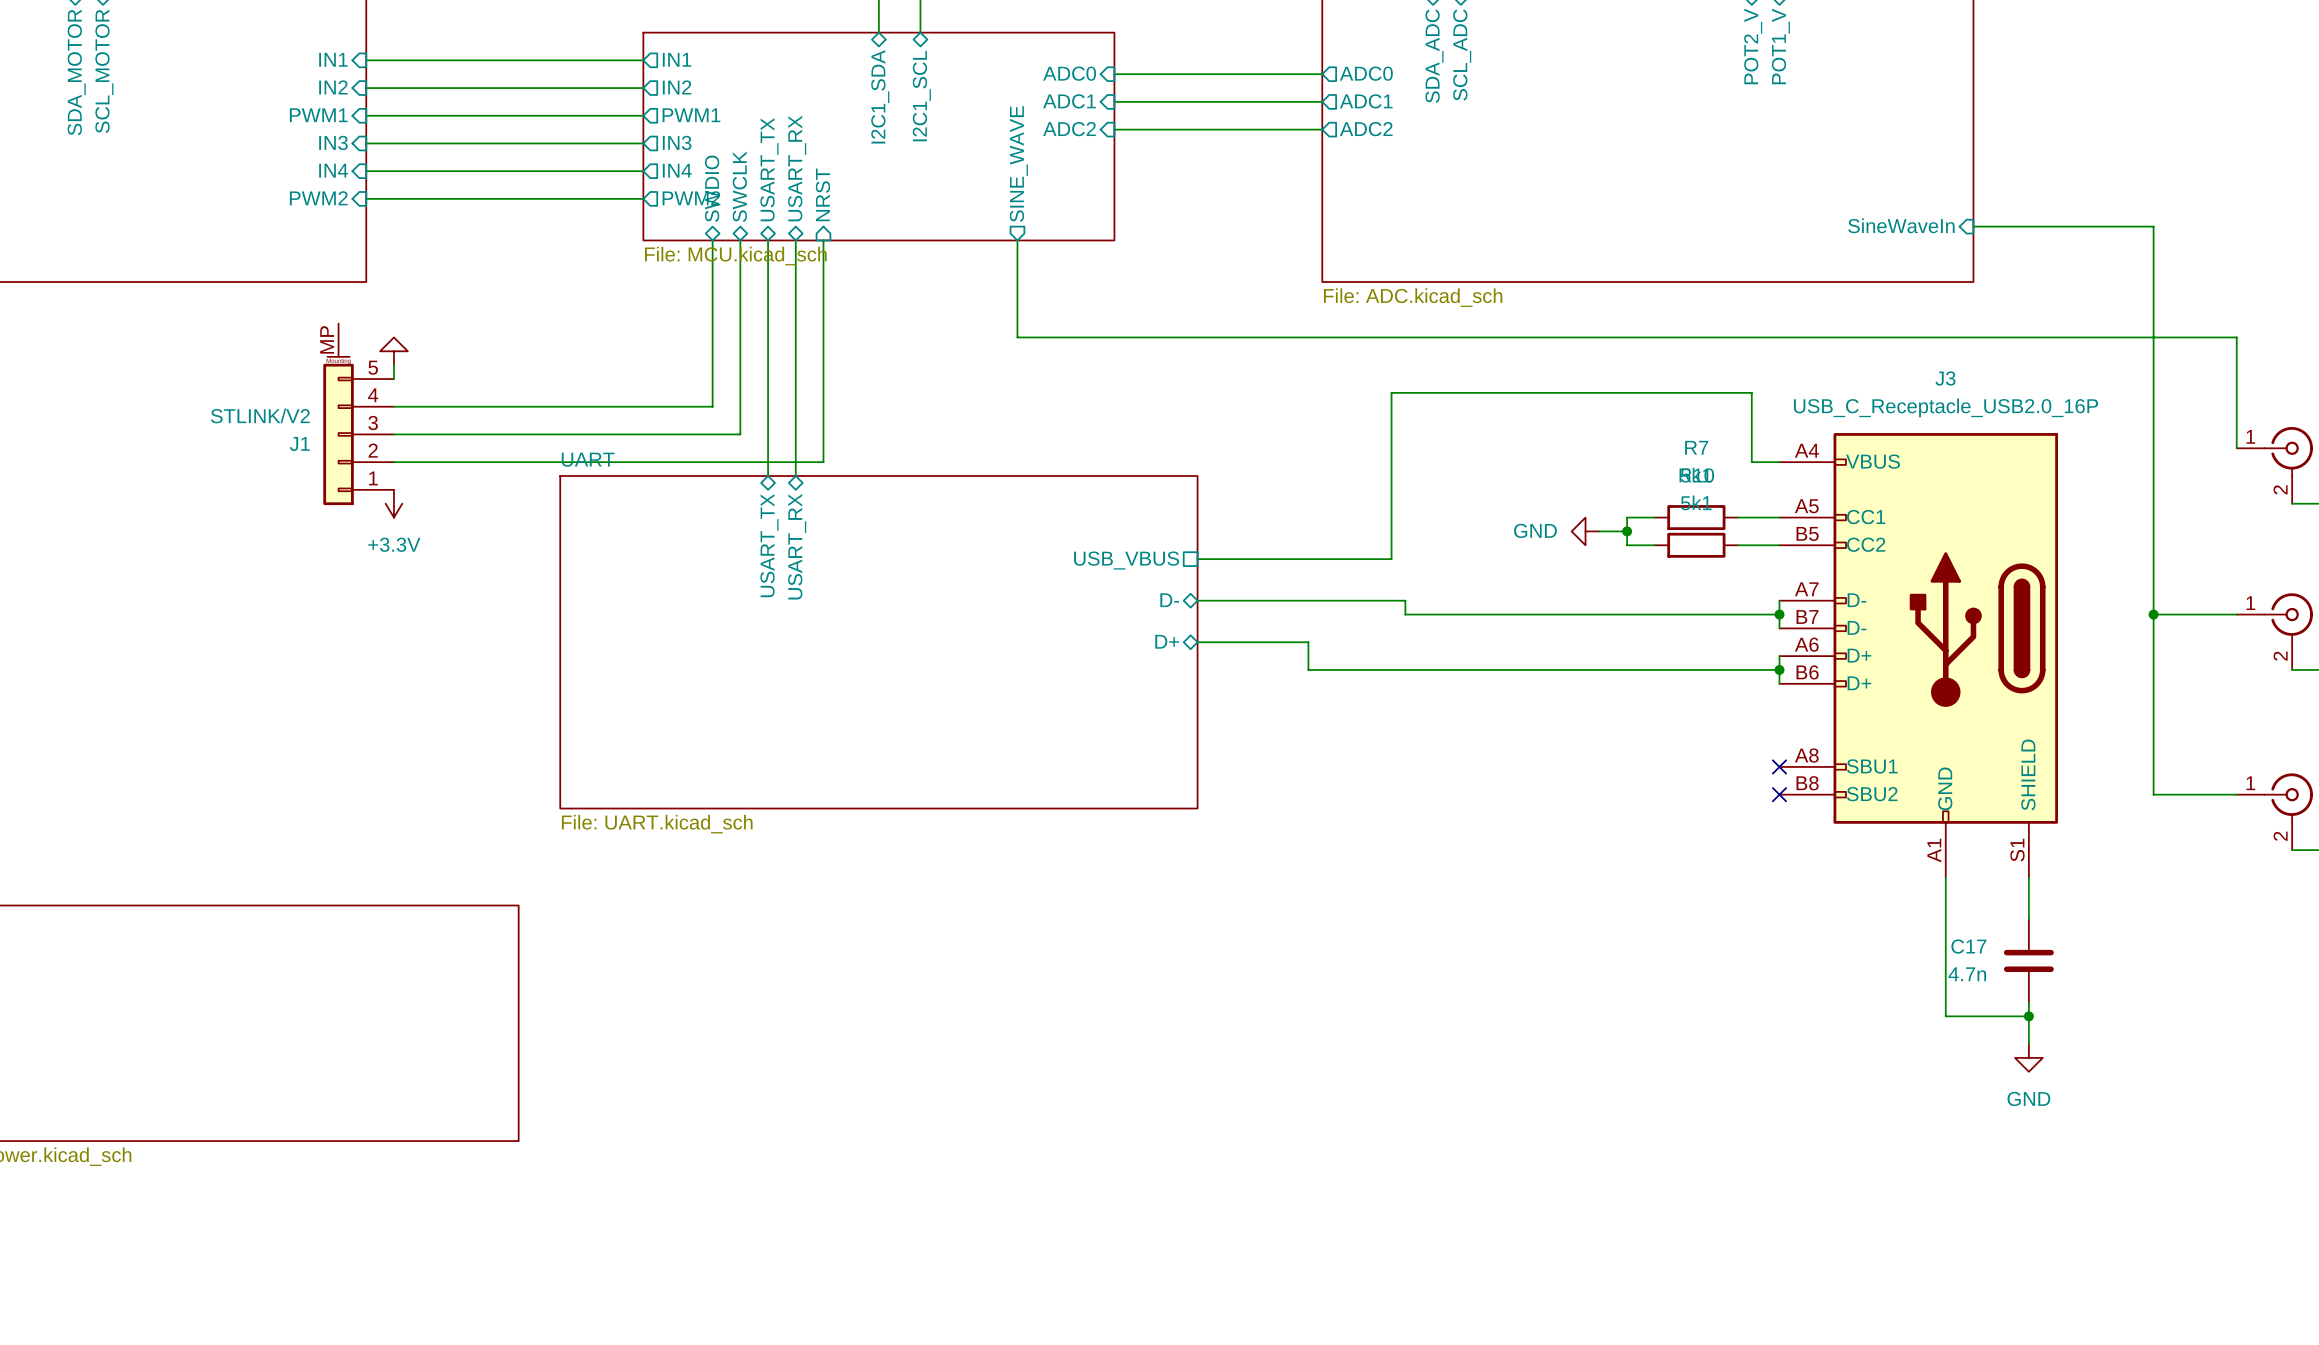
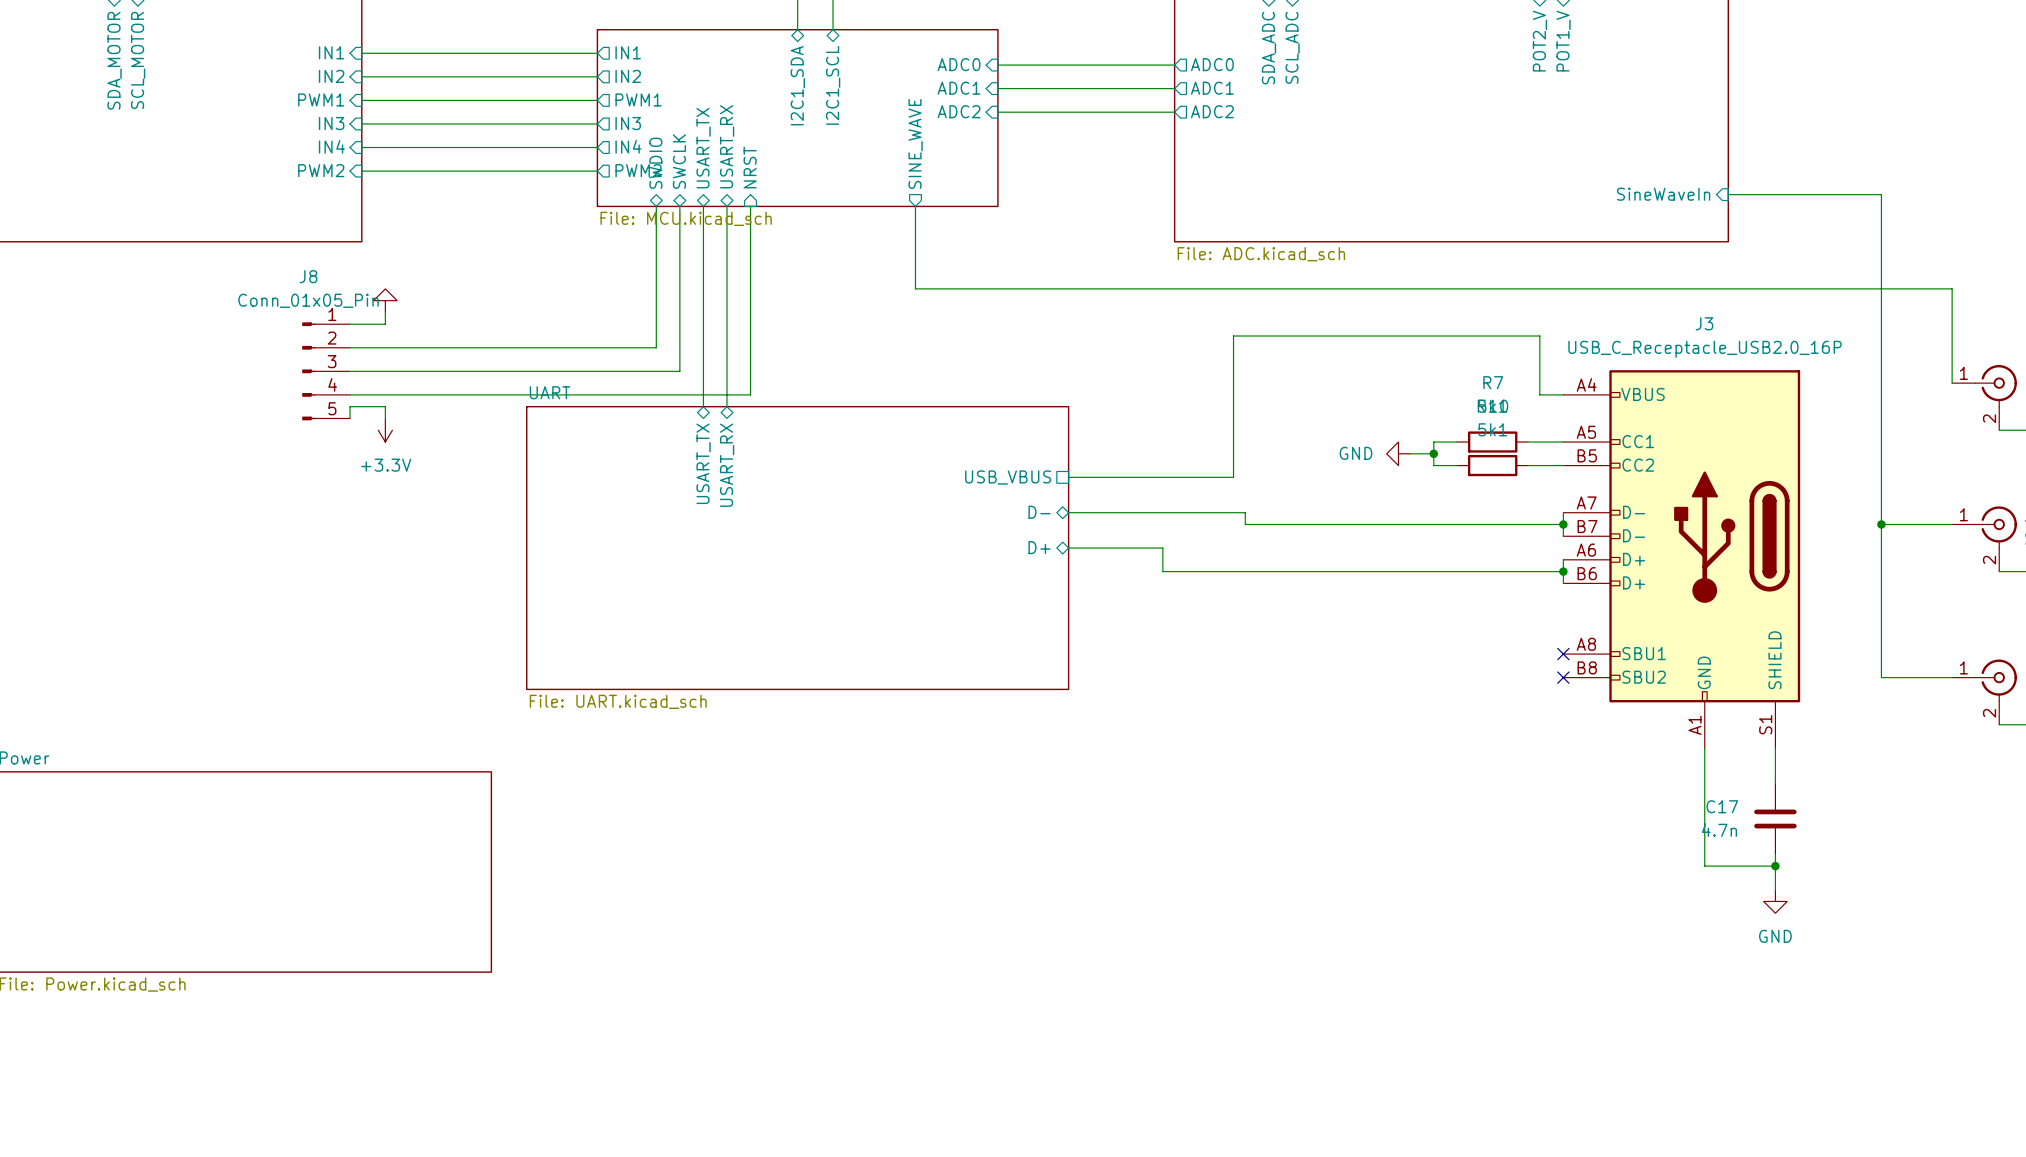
J1: STLINK/V2 (358, 414) -> none
J8: none -> Conn_01x05_Pin (326, 371)
wire: none -> (350, 418) (350, 406) (385, 406) (385, 418)

